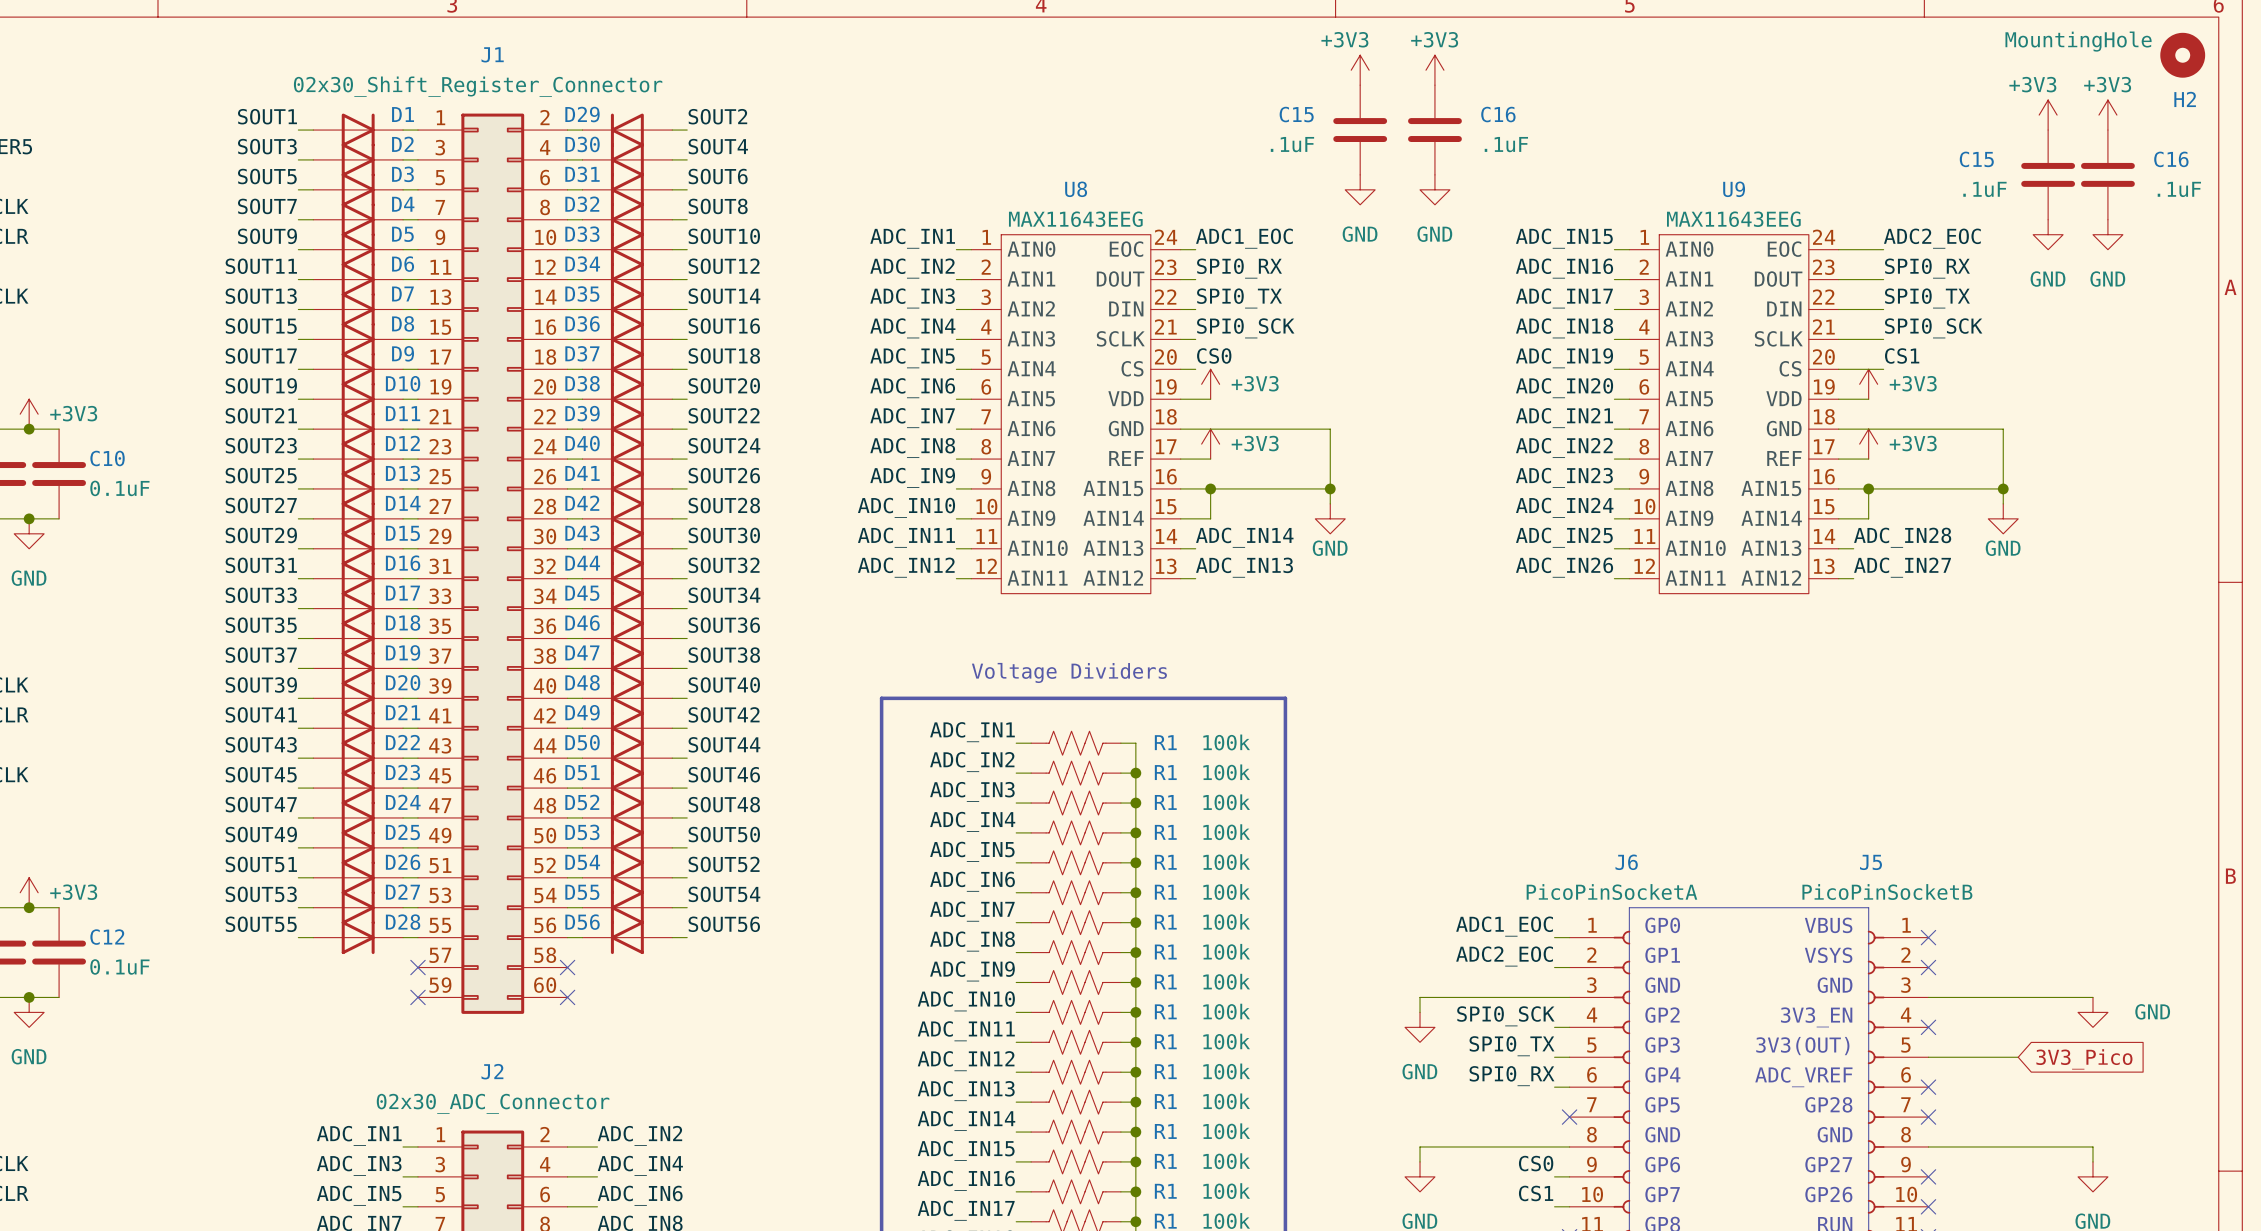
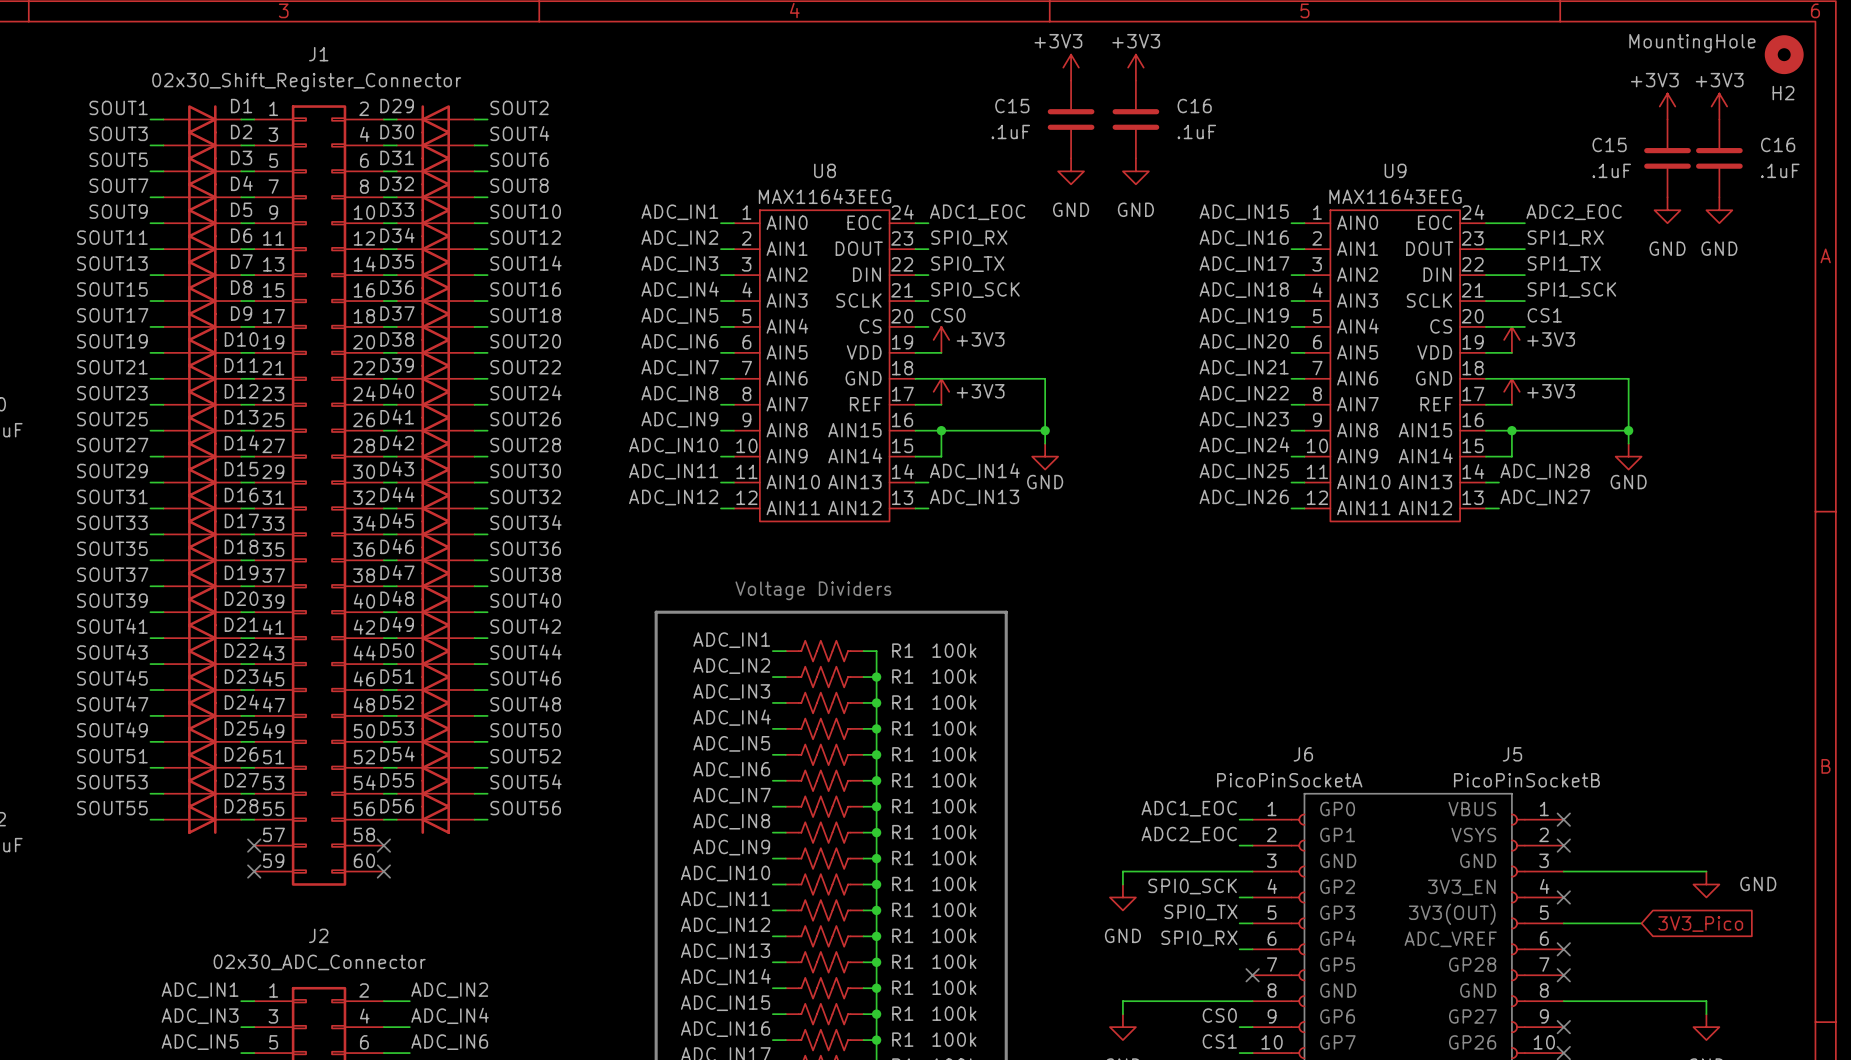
label: SPI0_RX (1927, 268) -> SPI1_RX (1565, 238)
label: SPI0_TX (1927, 298) -> SPI1_TX (1564, 264)
label: SPI0_SCK (1933, 328) -> SPI1_SCK (1571, 290)

